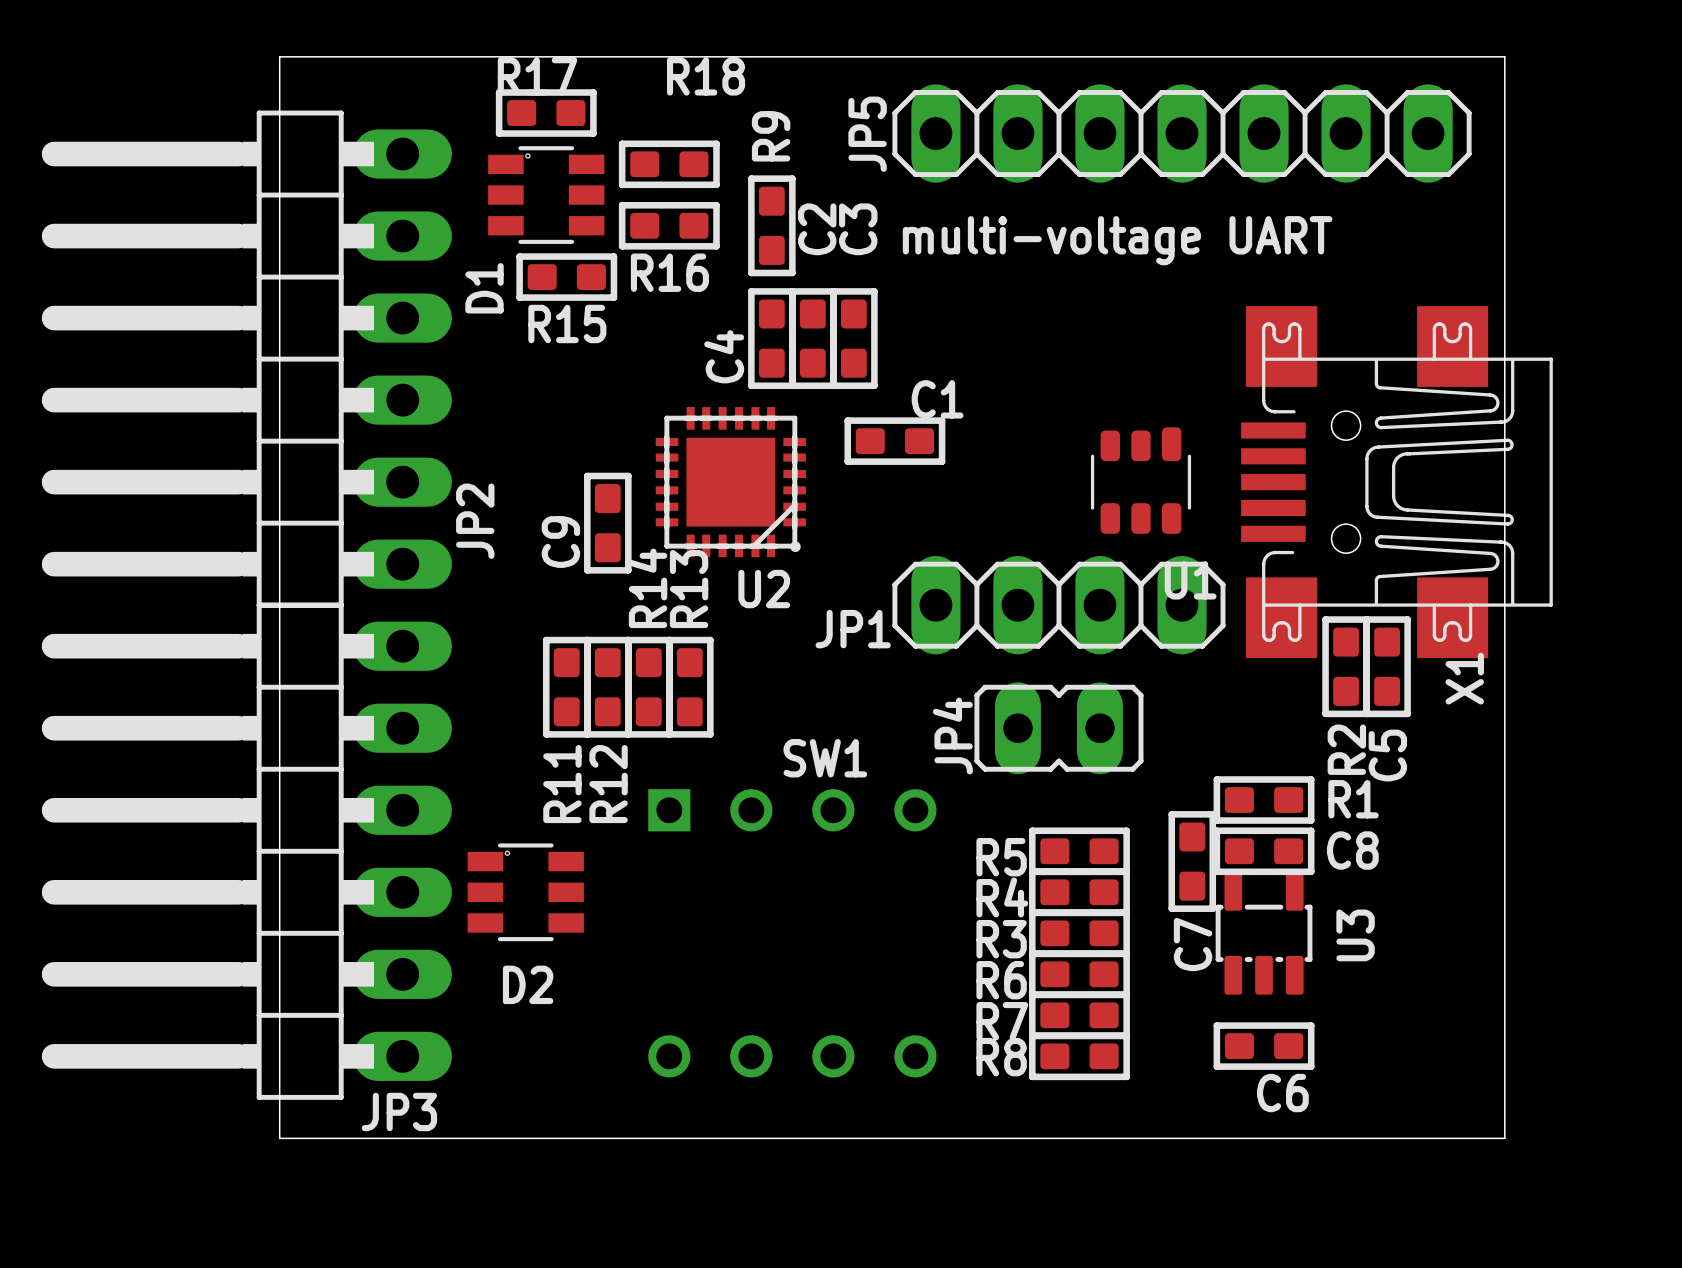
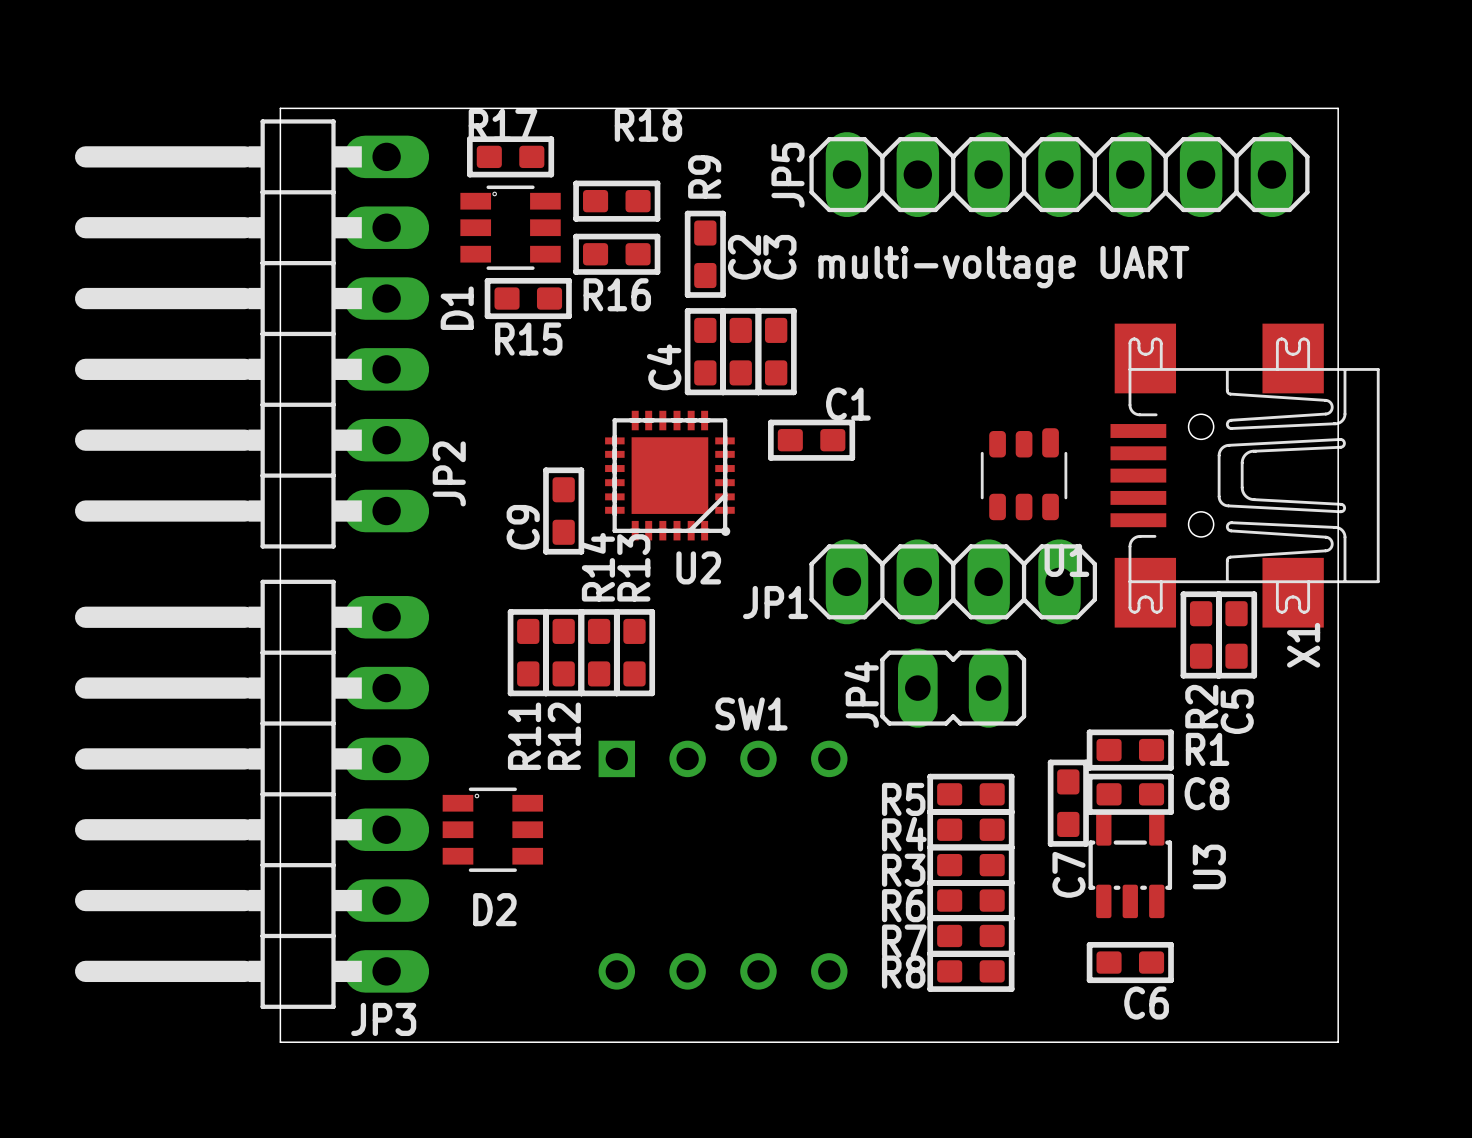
JP2 position: (246, 359) -> (252, 333)

